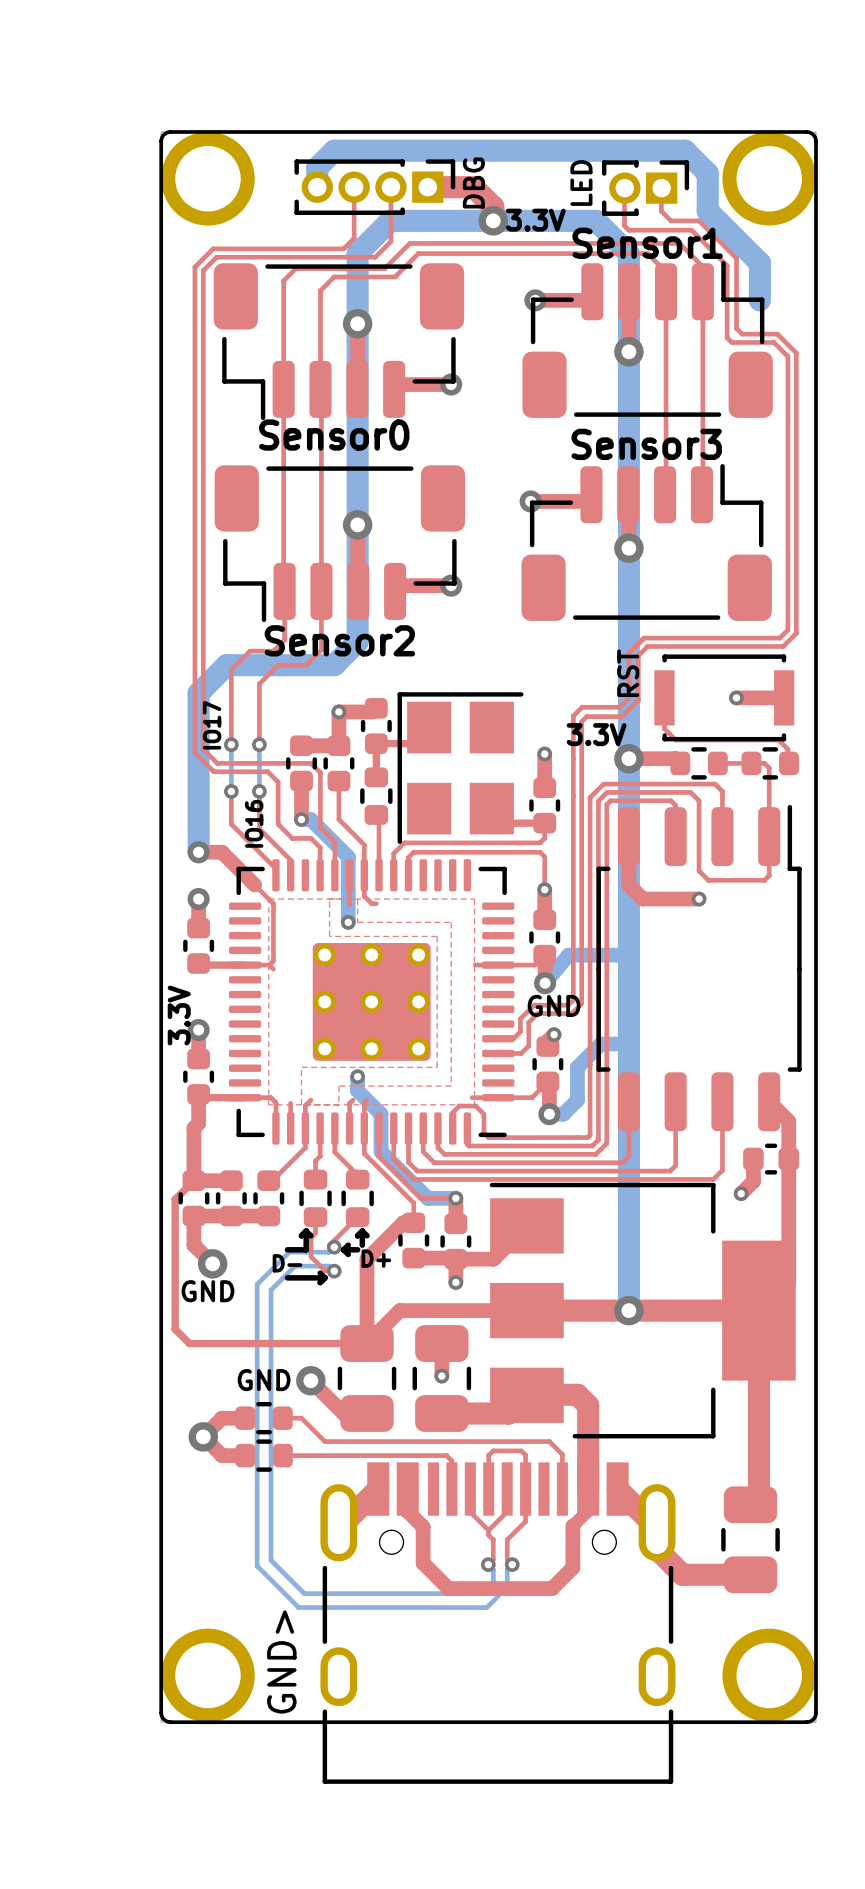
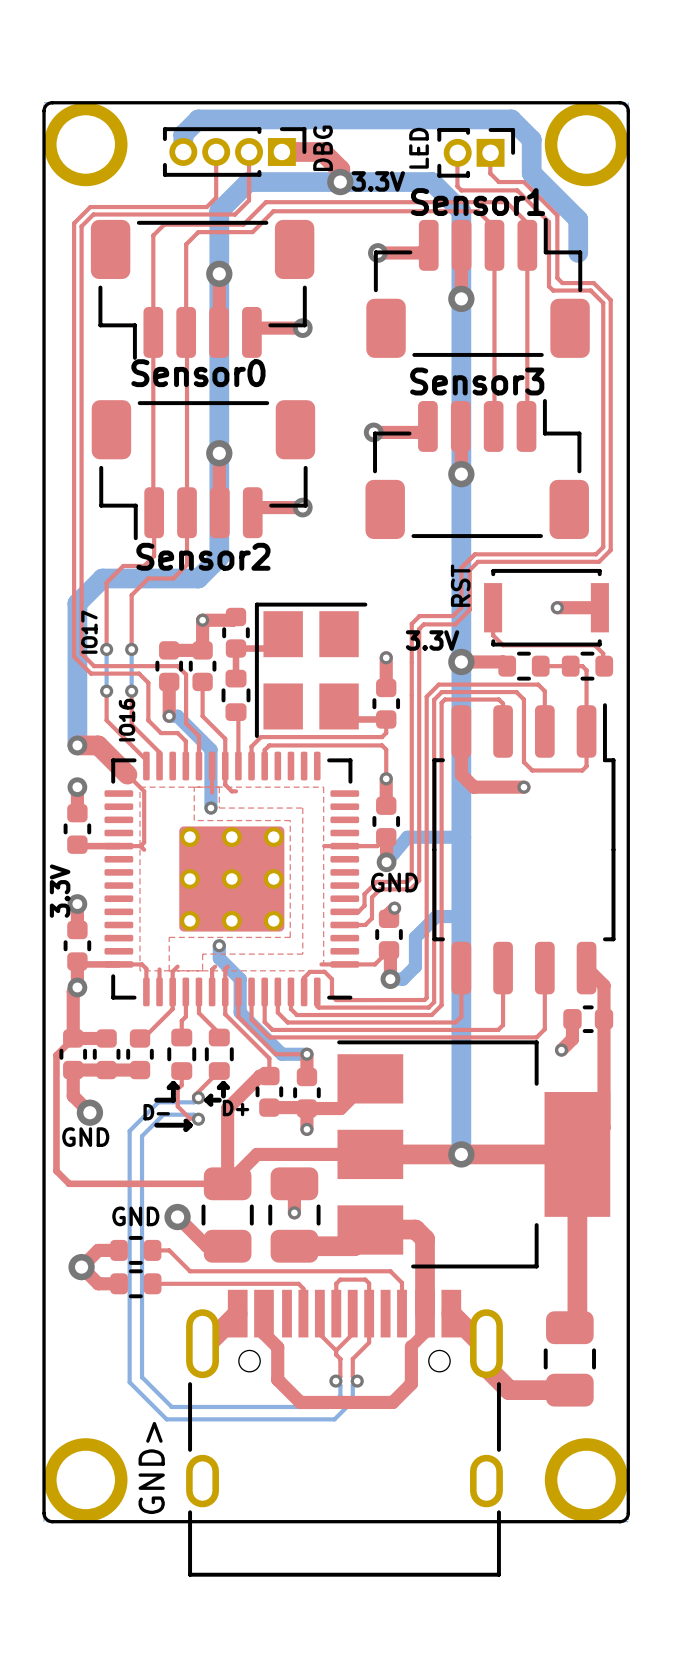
top track width: thin (198, 852) (222, 852) (254, 885) -> thick (77, 745) (98, 745) (127, 774)
via: none -> (77, 987)

